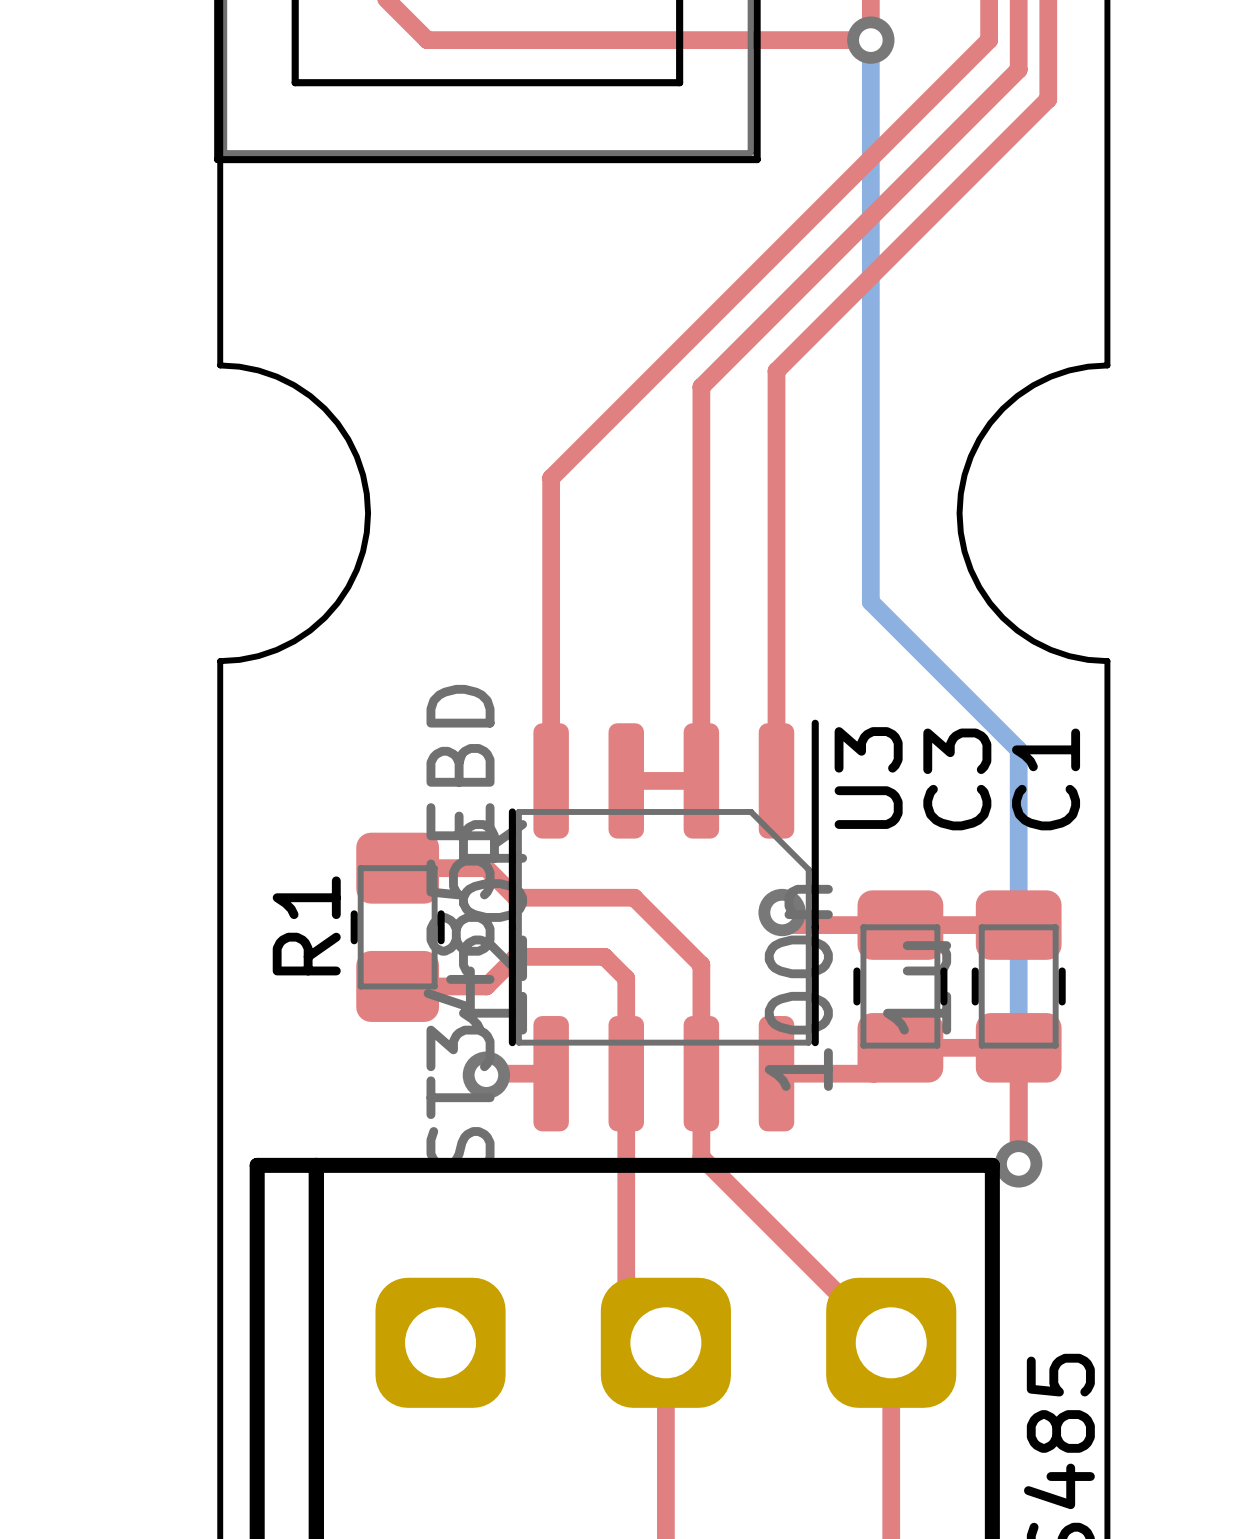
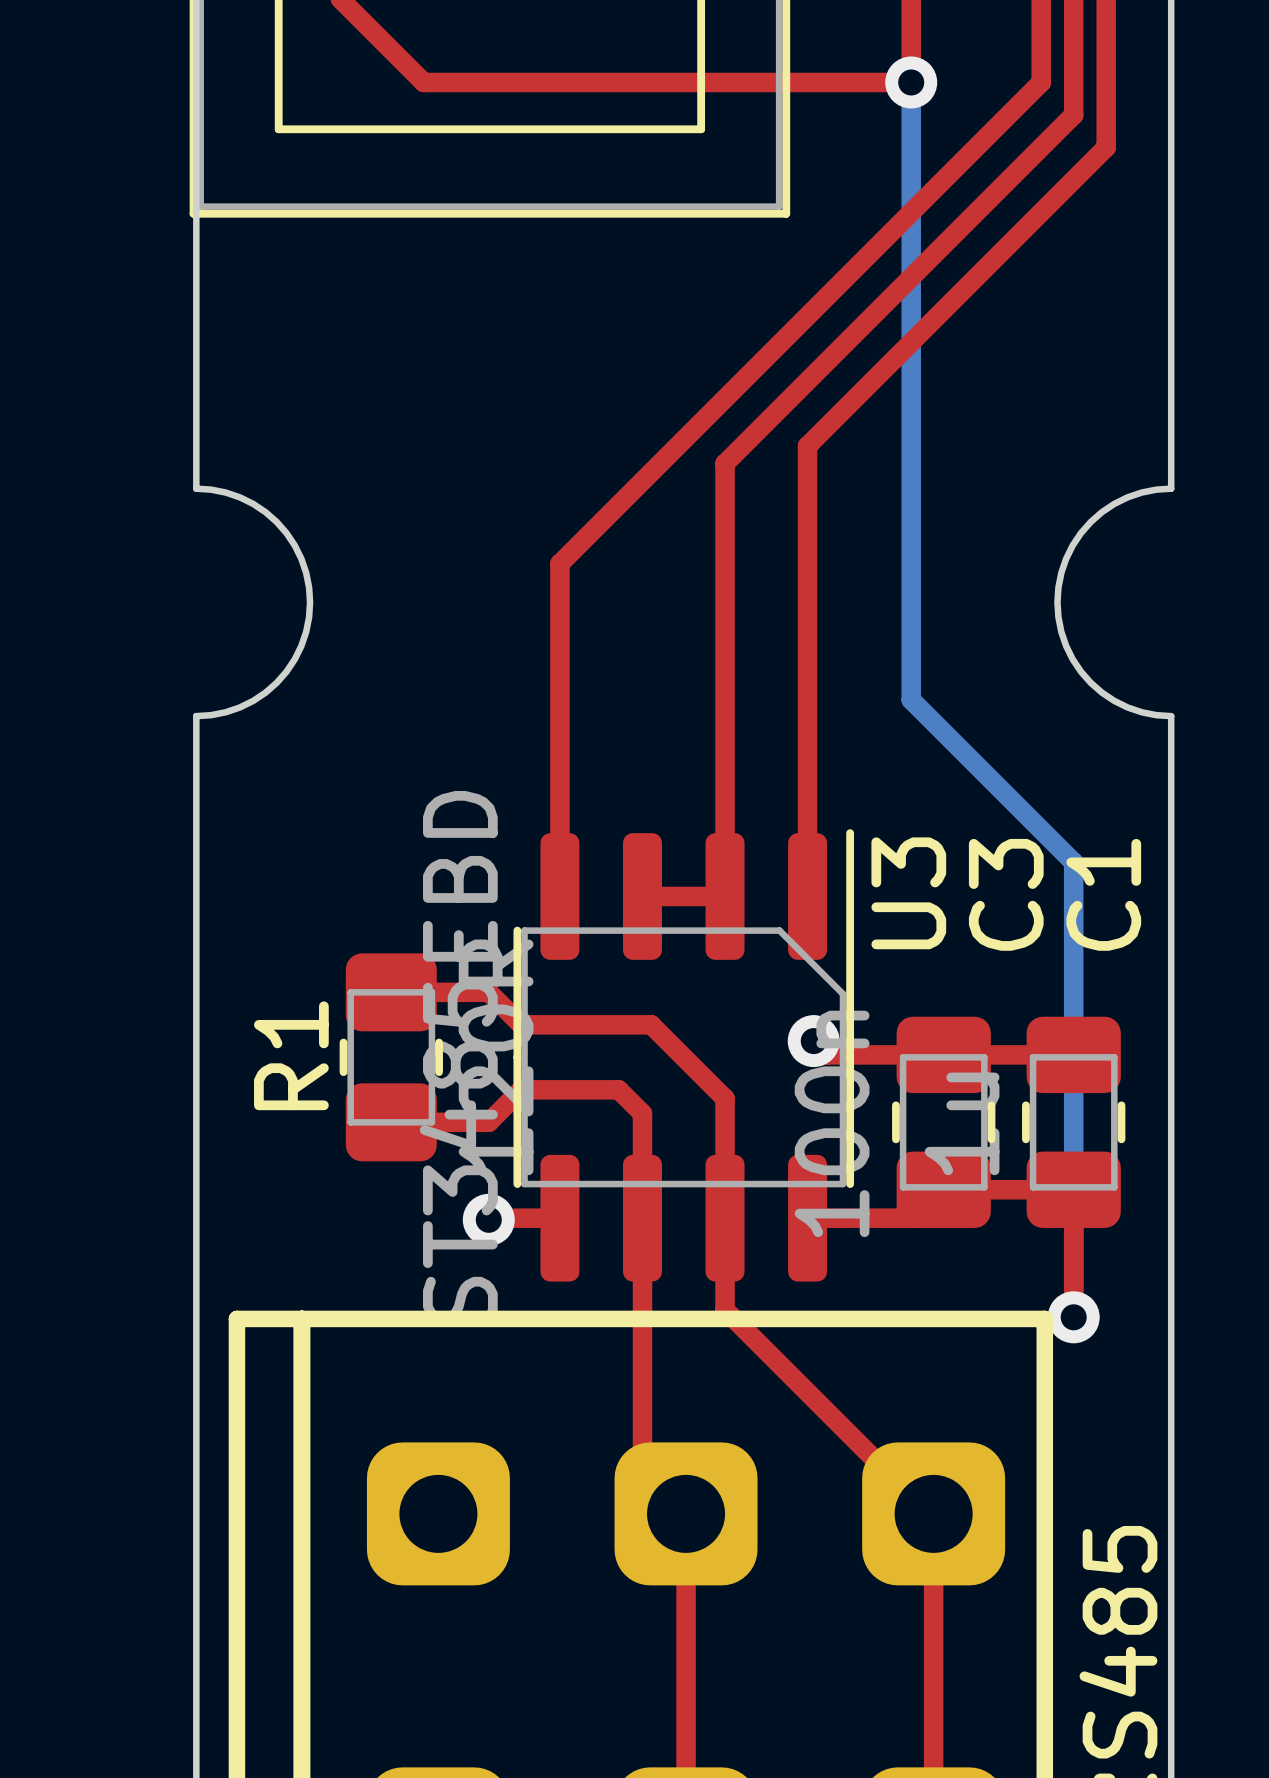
board edge: (220, 365) (239, 366) (276, 376) (310, 395) (324, 408) (337, 423) (356, 456) (366, 493) (368, 513) (366, 532) (356, 569) (337, 603) (324, 617) (310, 630) (276, 649) (239, 659) (220, 661) -> (196, 439) (196, 488) (225, 492) (239, 497) (265, 512) (276, 521) (286, 533) (301, 558) (306, 572) (310, 602) (306, 631) (301, 645) (286, 671) (276, 682) (265, 692) (239, 707) (225, 712) (196, 716) (196, 764)
board edge: (1107, 365) (1088, 366) (1050, 376) (1017, 395) (1002, 408) (979, 439) (970, 456) (960, 493) (959, 513) (960, 532) (970, 569) (979, 587) (1002, 617) (1017, 630) (1050, 649) (1088, 659) (1107, 661) -> (1171, 439) (1171, 488) (1141, 492) (1127, 497) (1101, 512) (1090, 521) (1080, 533) (1066, 558) (1058, 587) (1057, 602) (1058, 617) (1066, 645) (1080, 671) (1090, 682) (1101, 692) (1127, 707) (1141, 712) (1171, 716) (1171, 764)

